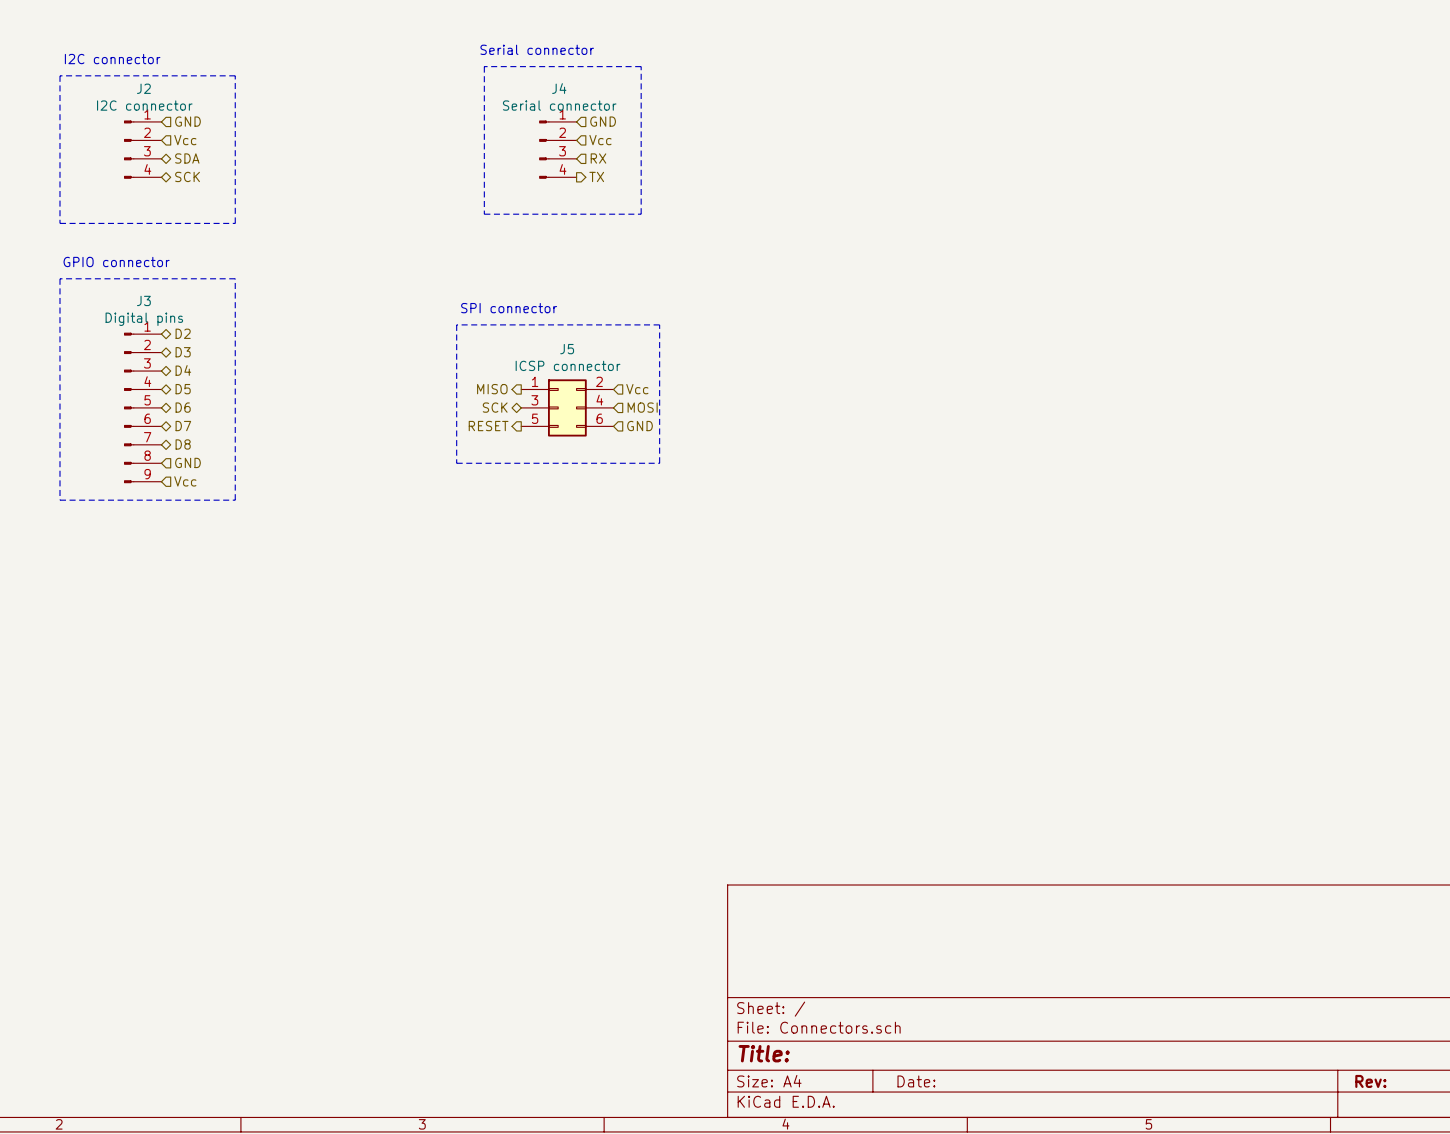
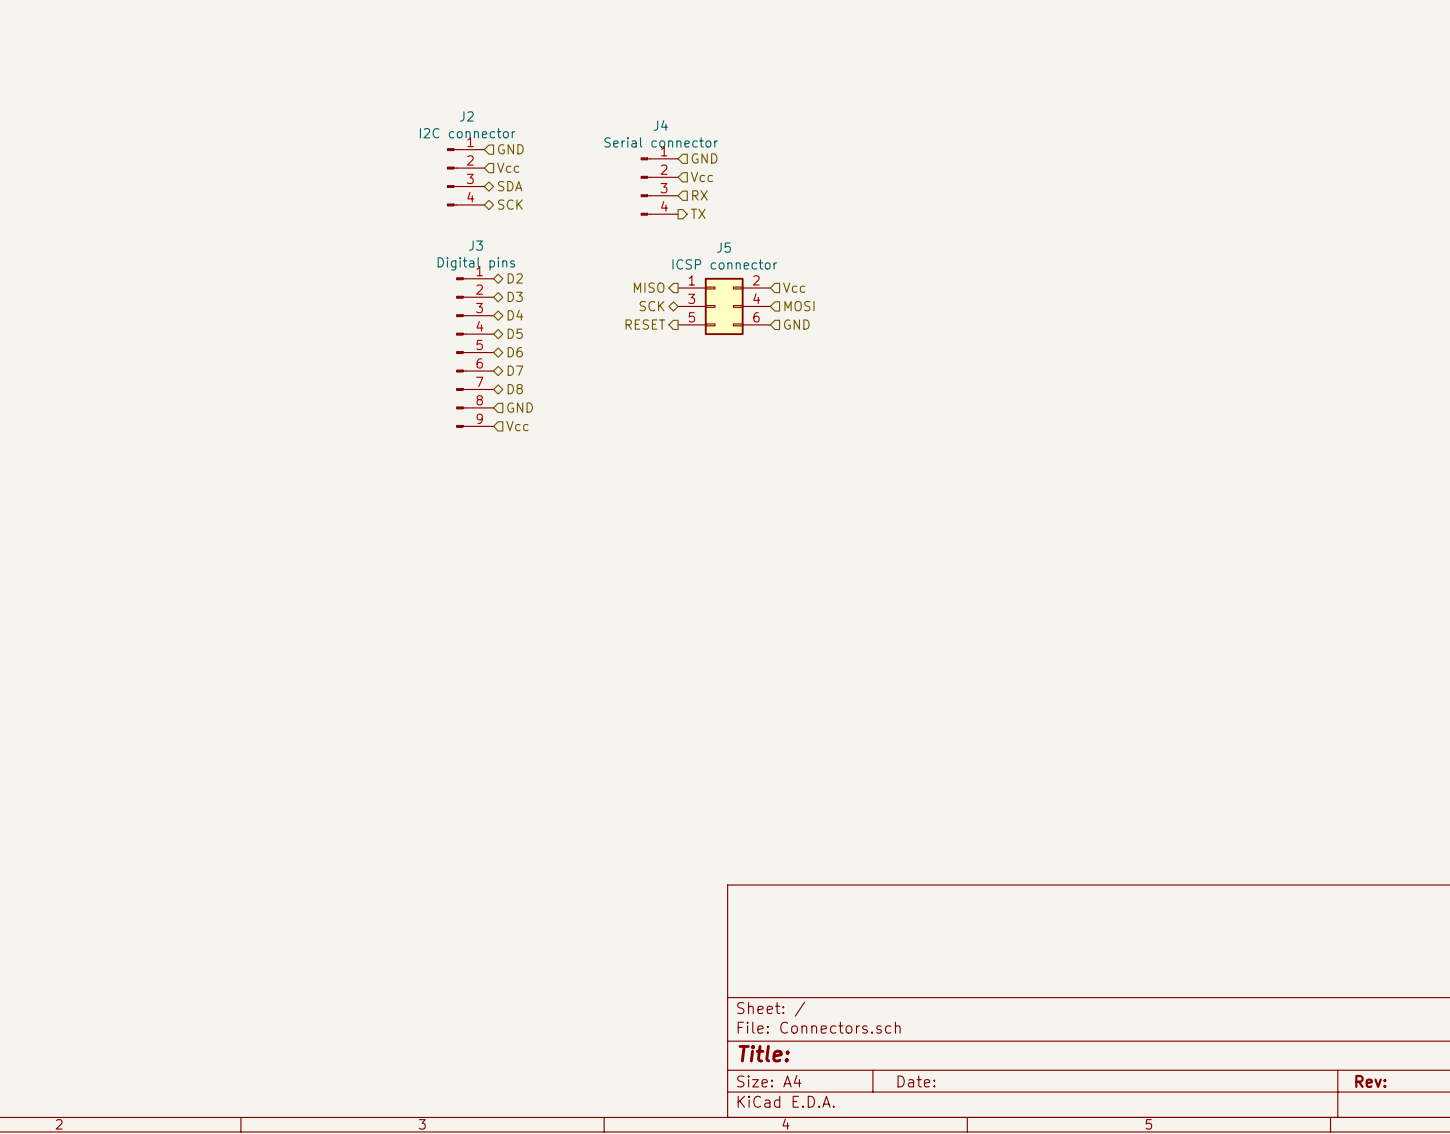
text: Serial connector (537, 49) -> none
text: I2C connector (112, 59) -> none
line: (484, 66) (484, 214) (641, 214) (641, 66) (484, 66) -> none
line: (59, 75) (59, 223) (235, 223) (235, 75) (59, 75) -> none
hierarchical label: GND (187, 121) -> none
hierarchical label: GND (603, 121) -> none
hierarchical label: Vcc (185, 140) -> none
hierarchical label: Vcc (600, 140) -> none
J2 position: (142, 149) -> (465, 177)
hierarchical label: none -> GND (510, 149)
J4 position: (557, 149) -> (659, 186)
hierarchical label: SDA (187, 158) -> none
hierarchical label position: RX (598, 158) -> RX (699, 195)
hierarchical label: none -> GND (704, 158)
hierarchical label: none -> Vcc (508, 167)
hierarchical label: SCK (187, 176) -> none
hierarchical label position: TX (596, 176) -> TX (698, 213)
hierarchical label: none -> Vcc (701, 176)
hierarchical label: none -> SDA (510, 186)
hierarchical label: none -> SCK (510, 204)
text: GPIO connector (116, 261) -> none
line: (59, 278) (59, 500) (235, 500) (235, 278) (59, 278) -> none
hierarchical label: none -> D2 (515, 278)
hierarchical label: none -> MISO (649, 287)
hierarchical label: none -> Vcc (794, 287)
hierarchical label: none -> D3 (515, 296)
hierarchical label: none -> SCK (652, 306)
hierarchical label: none -> MOSI (799, 306)
text: SPI connector (509, 308) -> none
hierarchical label: none -> D4 (515, 315)
line: (456, 324) (456, 463) (659, 463) (659, 324) (456, 324) -> none
hierarchical label: none -> RESET (645, 324)
hierarchical label: none -> GND (796, 324)
hierarchical label: D2 (183, 333) -> none
hierarchical label: none -> D5 (515, 333)
hierarchical label: D3 (183, 352) -> none
hierarchical label: none -> D6 (515, 352)
hierarchical label: D4 (183, 370) -> none
hierarchical label: none -> D7 (515, 370)
hierarchical label: D5 (183, 389) -> none
hierarchical label shape: output (492, 389) -> bidirectional (515, 389)
hierarchical label: MISO (492, 389) -> D8 (515, 389)
hierarchical label: Vcc (637, 389) -> none
J3 position: (142, 407) -> (474, 352)
hierarchical label: D6 (183, 407) -> none
hierarchical label shape: bidirectional (495, 407) -> input (520, 407)
hierarchical label: SCK (495, 407) -> GND (520, 407)
J5 position: (567, 407) -> (724, 306)
hierarchical label: MOSI (642, 407) -> none
hierarchical label: D7 (183, 426) -> none
hierarchical label shape: output (488, 426) -> input (517, 426)
hierarchical label: RESET (488, 426) -> Vcc (517, 426)
hierarchical label: GND (640, 426) -> none
hierarchical label: D8 (183, 444) -> none
hierarchical label: GND (187, 462) -> none
hierarchical label: Vcc (185, 481) -> none

